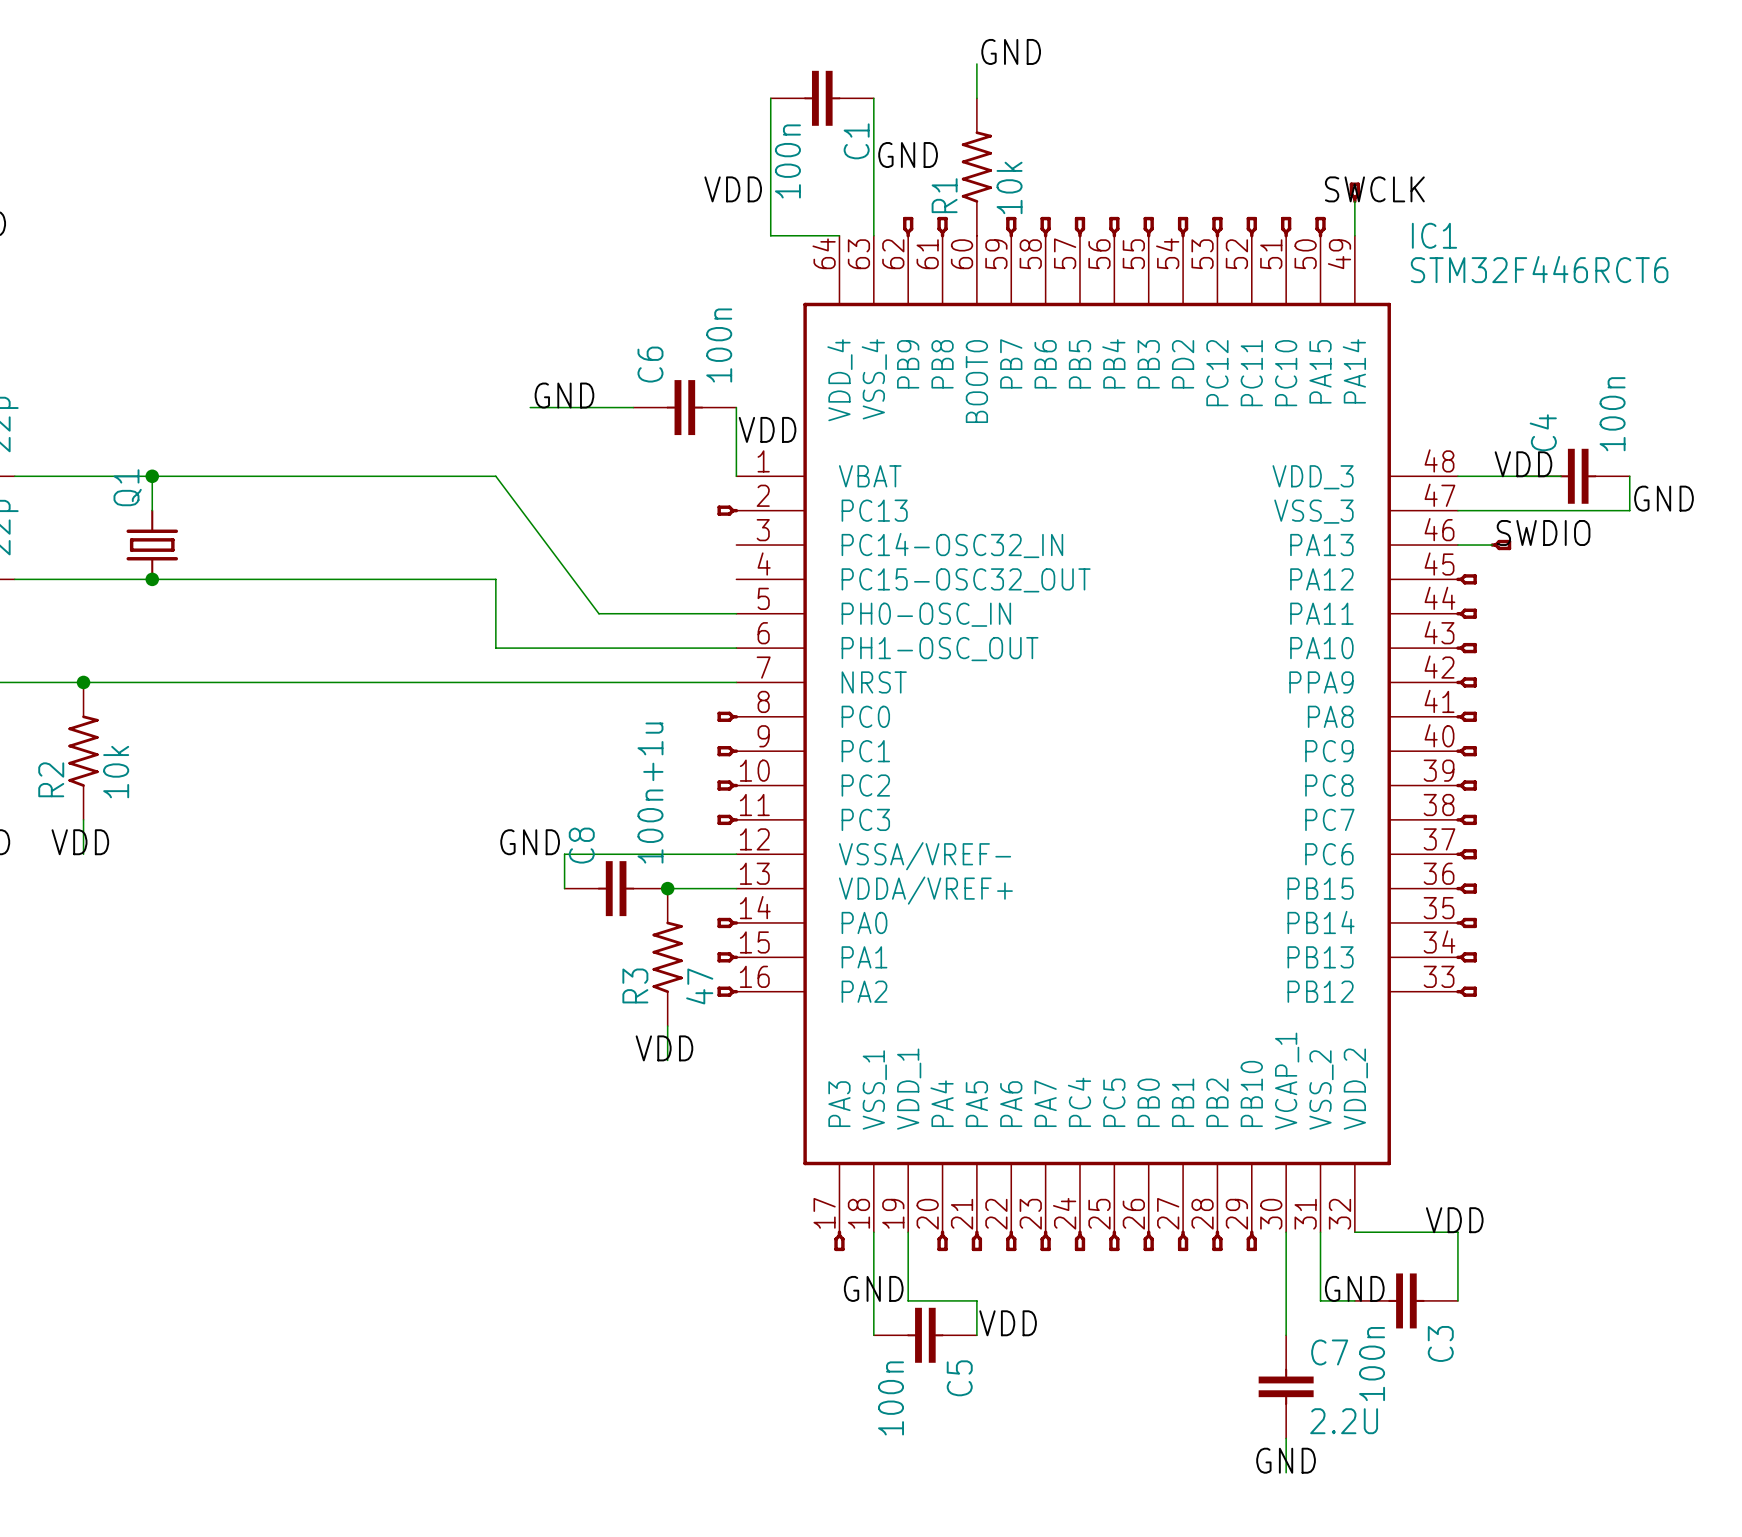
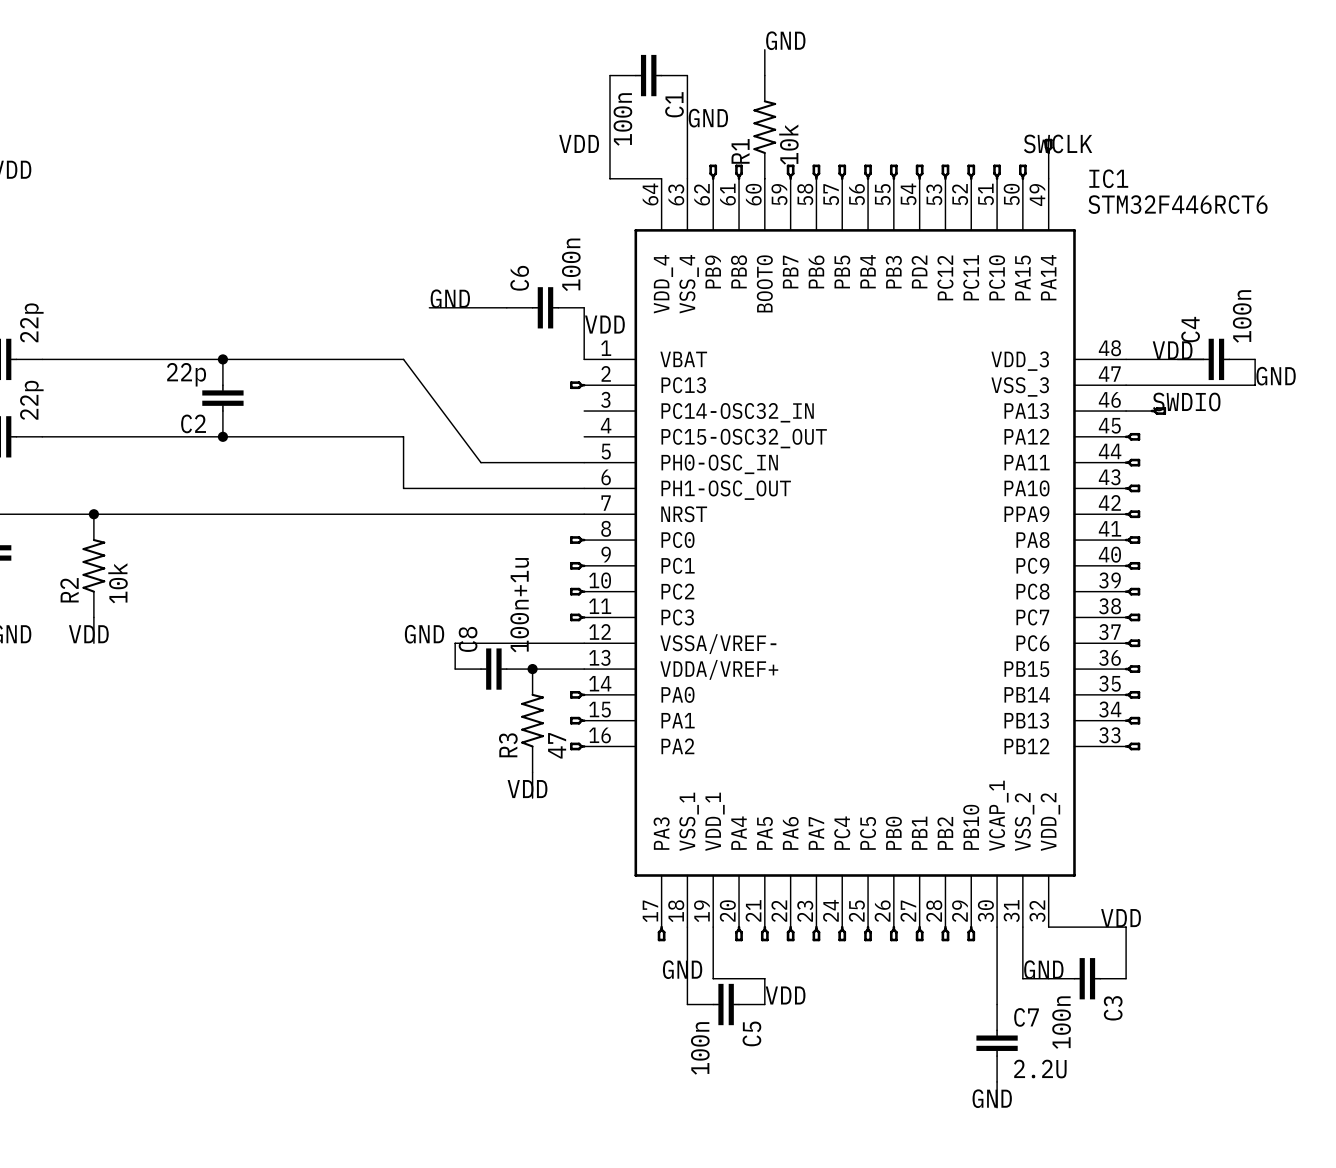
wire: (152, 476) (152, 510) -> none
junction: (152, 476) -> none
junction: none -> (222, 359)
C2: none -> 22p (222, 398)
Q1: (152, 545) -> none
junction: (152, 579) -> none
junction: none -> (222, 436)

